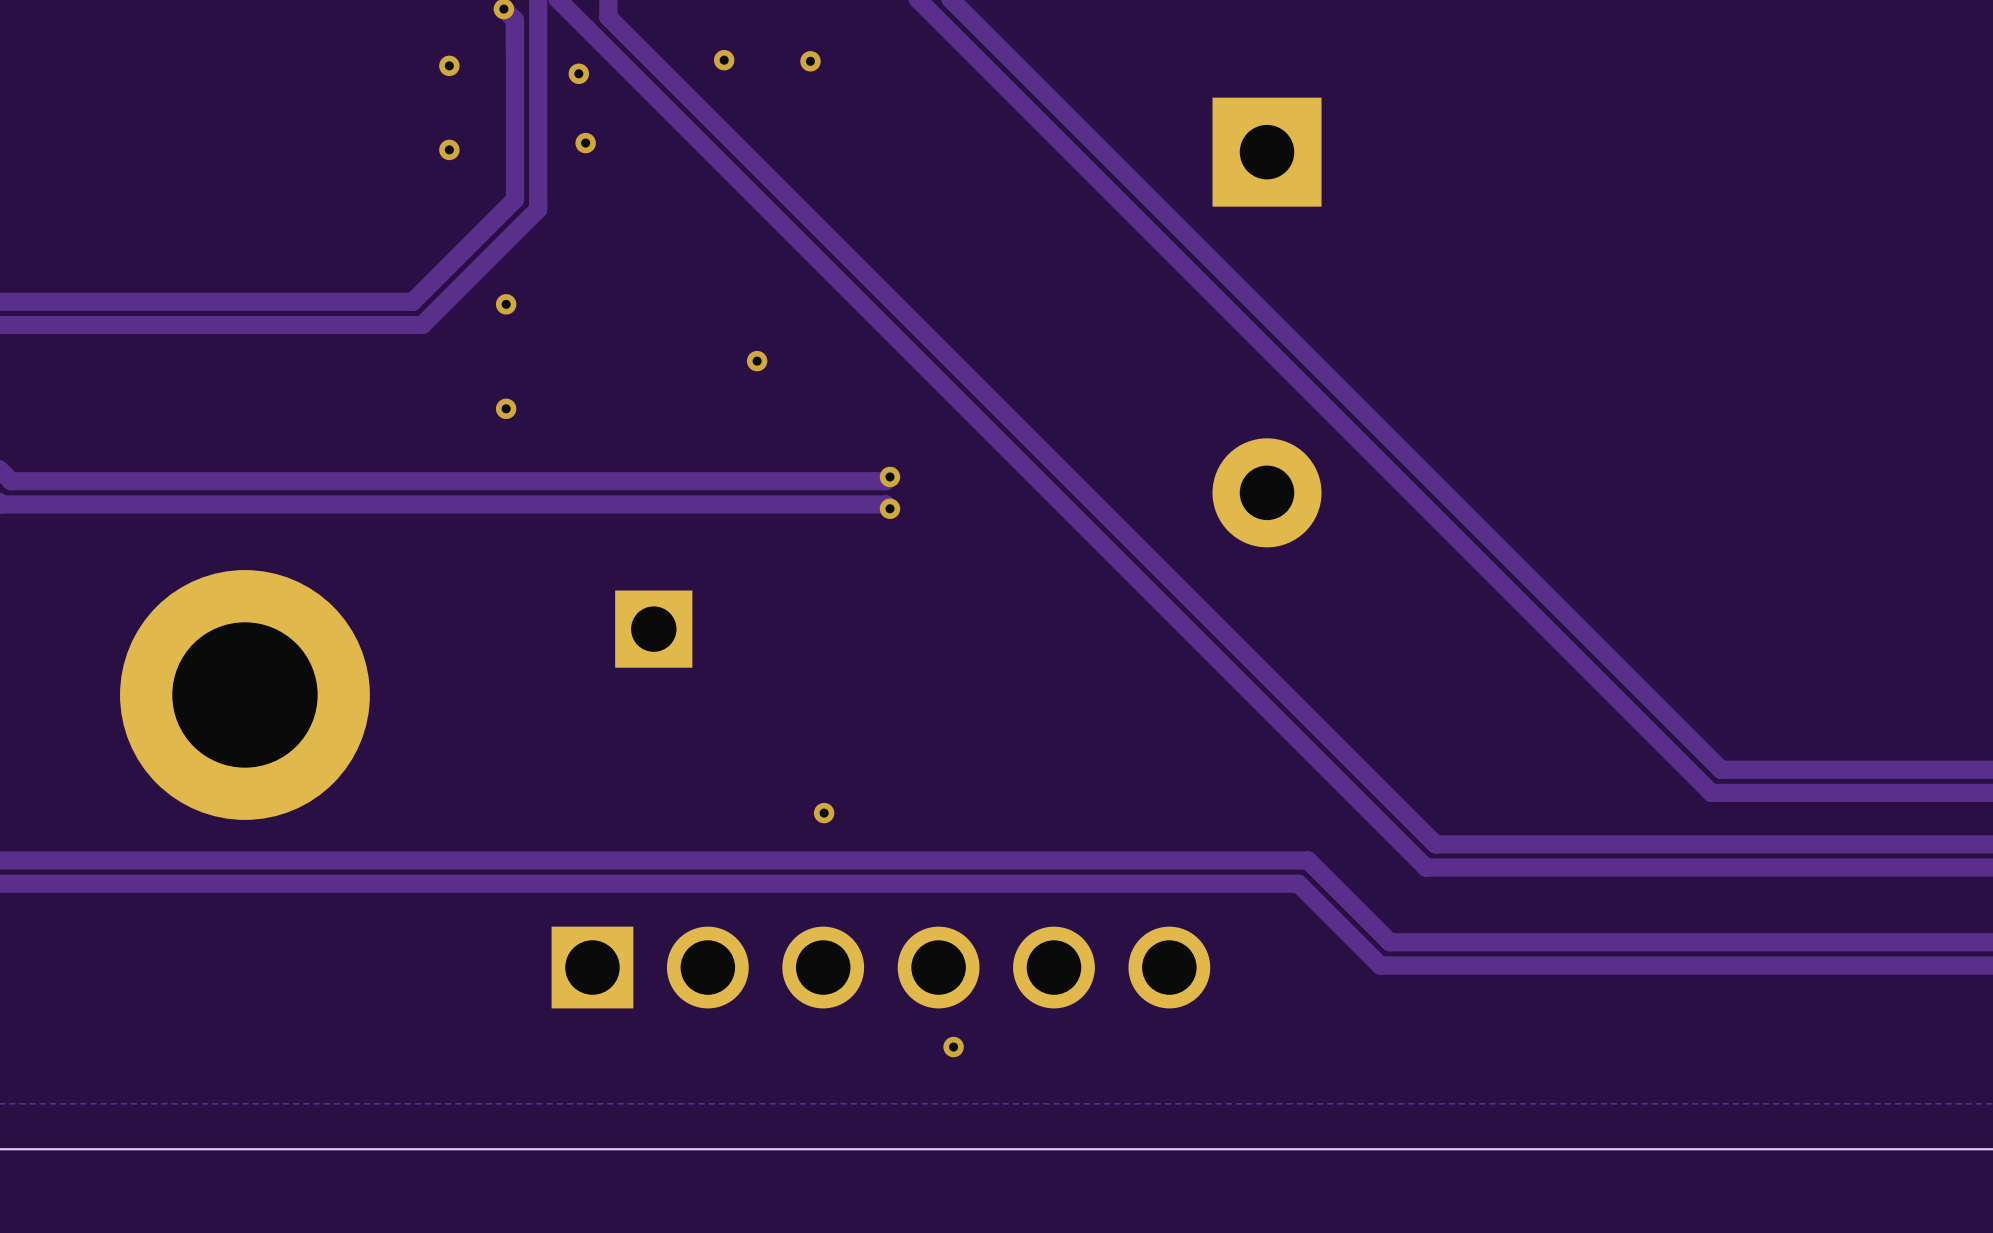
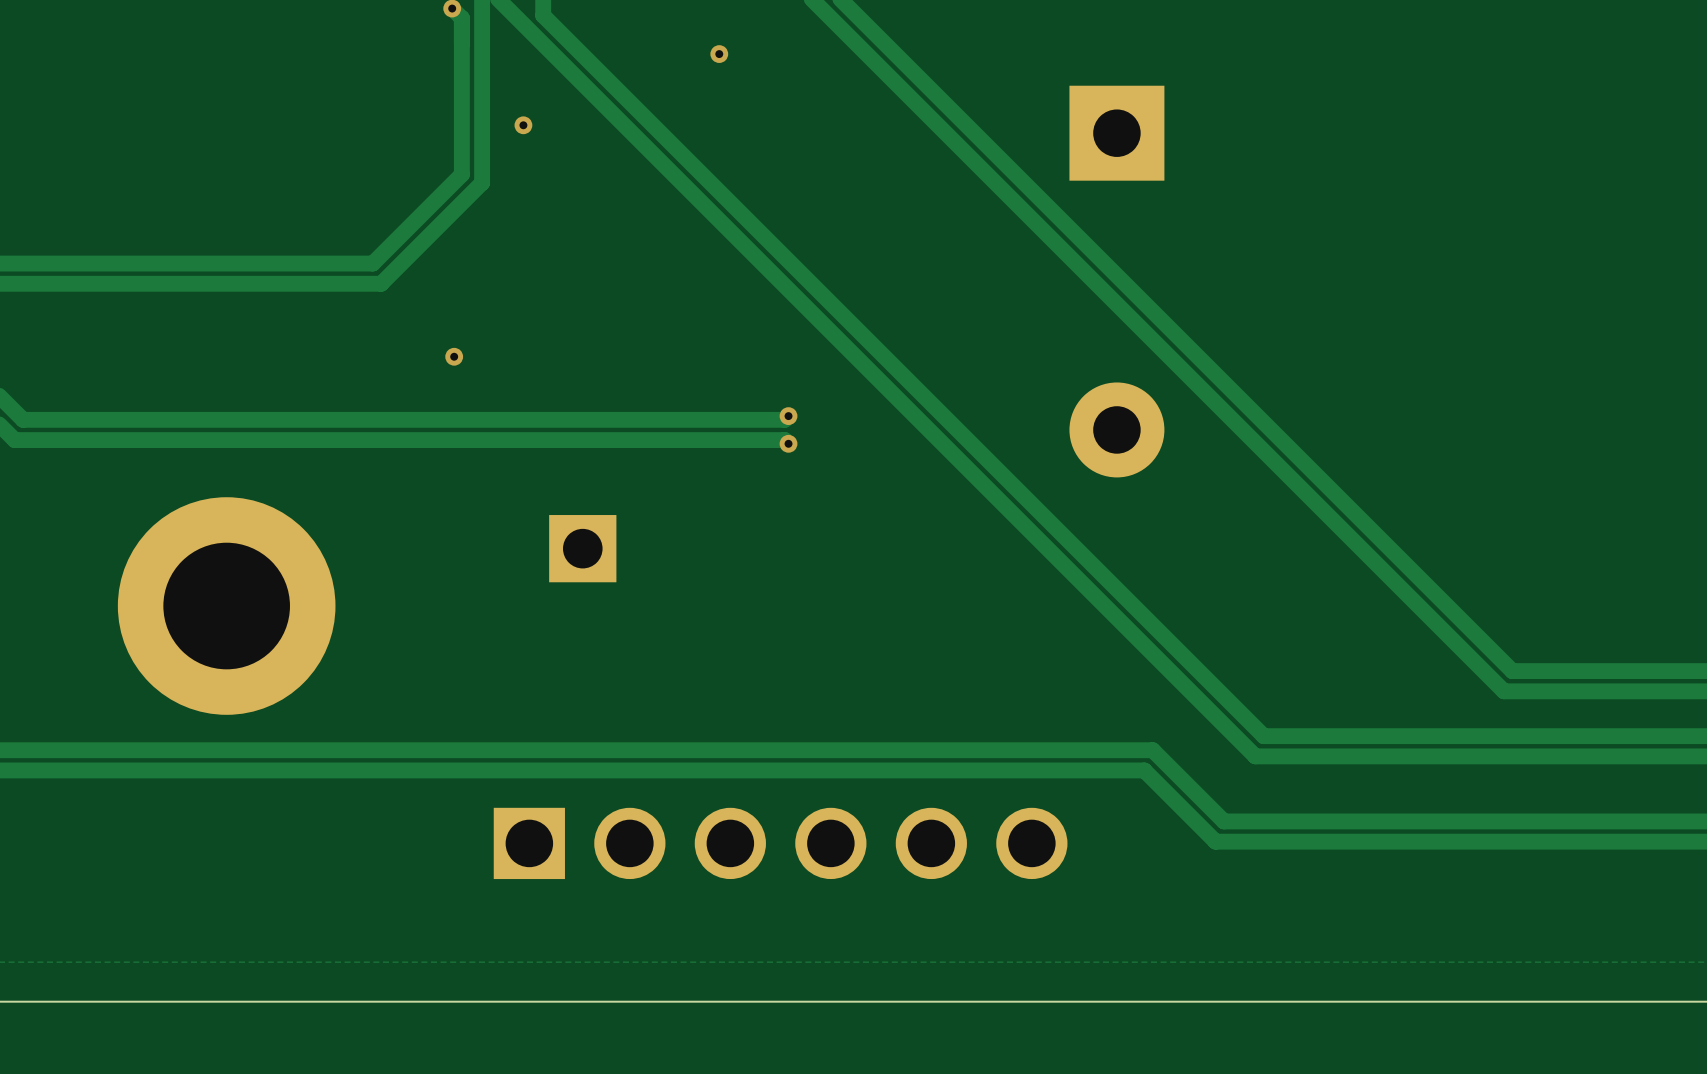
via: (724, 60) -> none
via: (449, 65) -> none
via: (578, 73) -> none
via: (449, 149) -> none
via: (506, 304) -> none
via: (757, 361) -> none
via: (824, 813) -> none
via: (953, 1047) -> none

